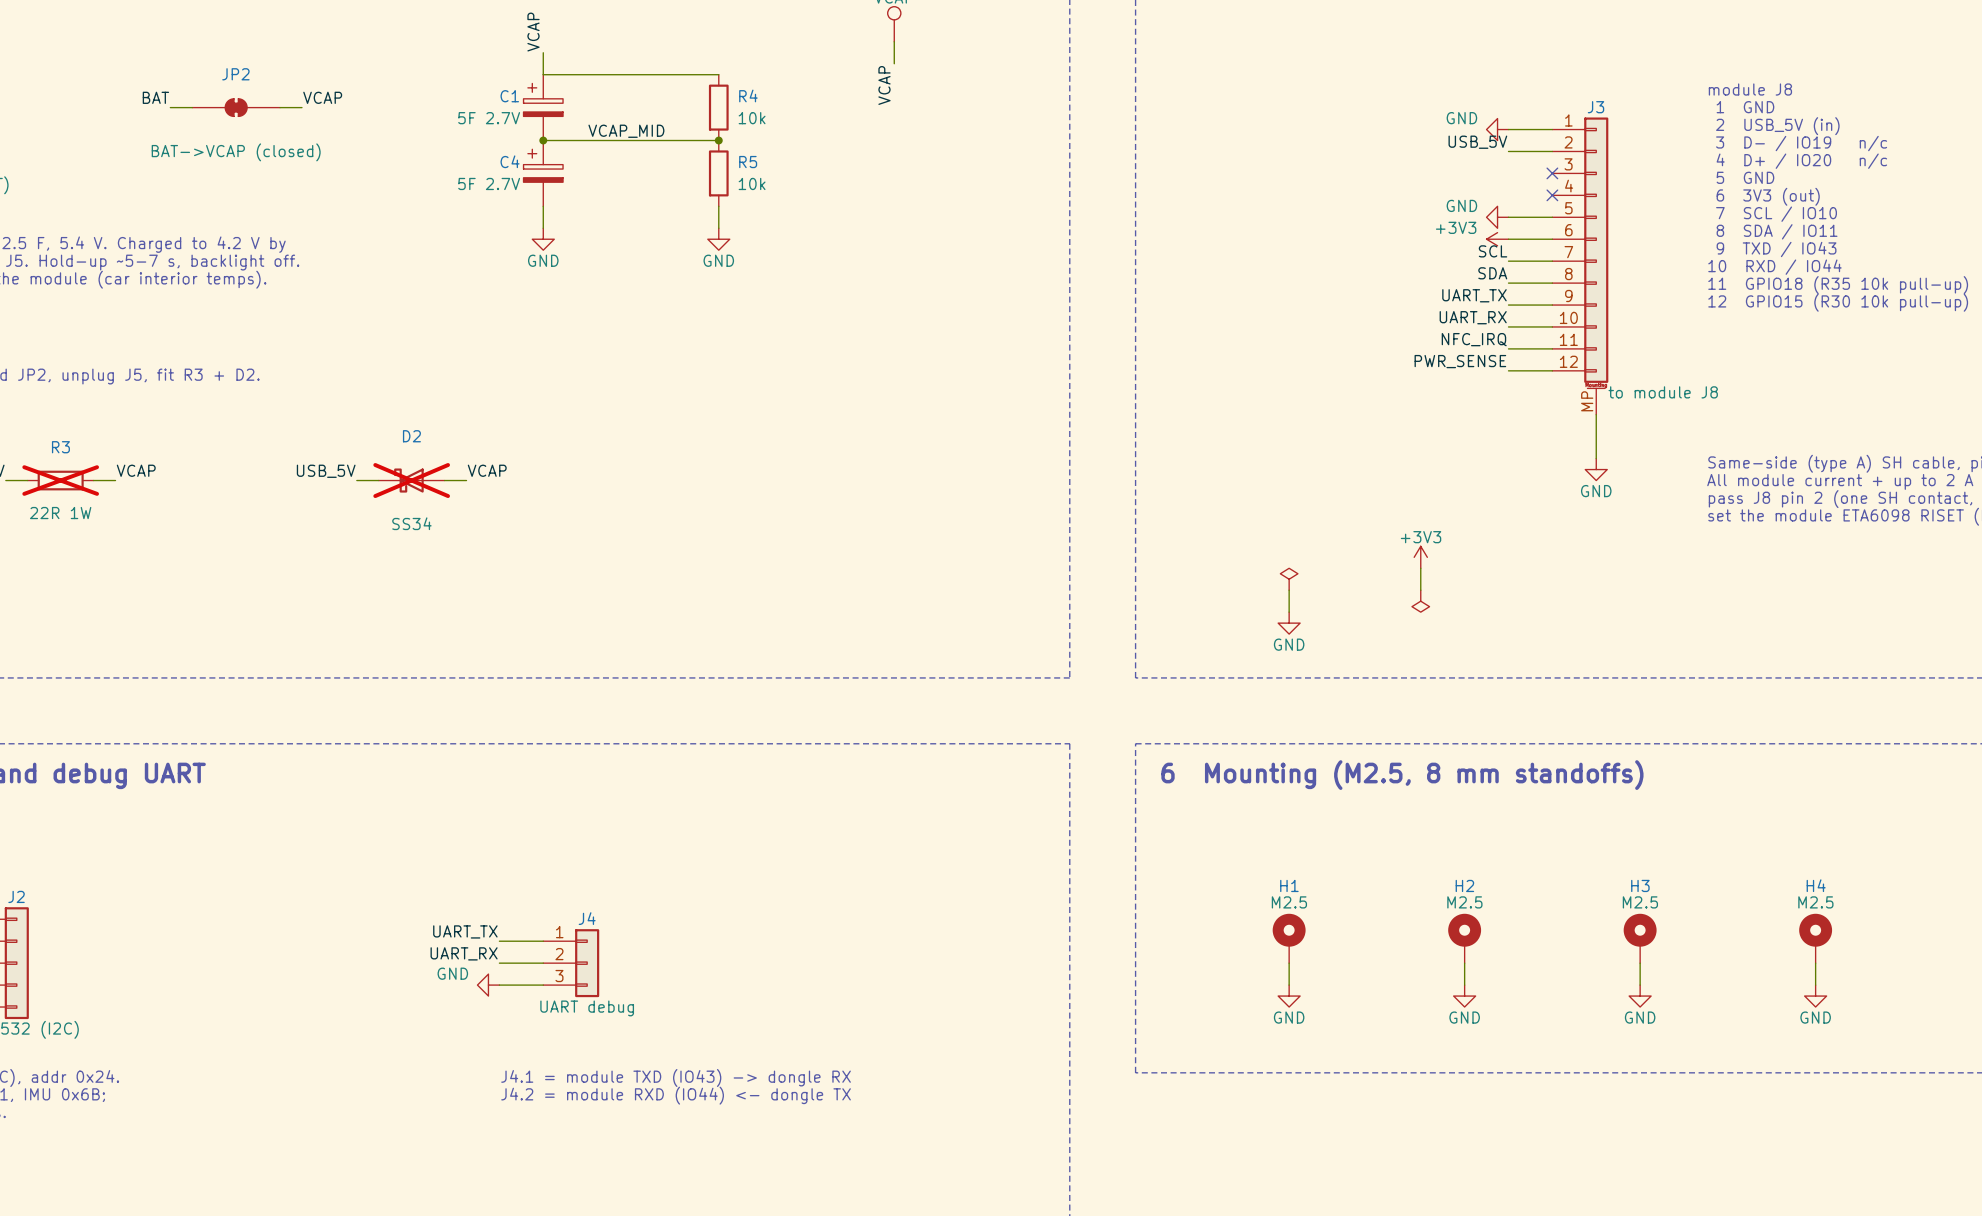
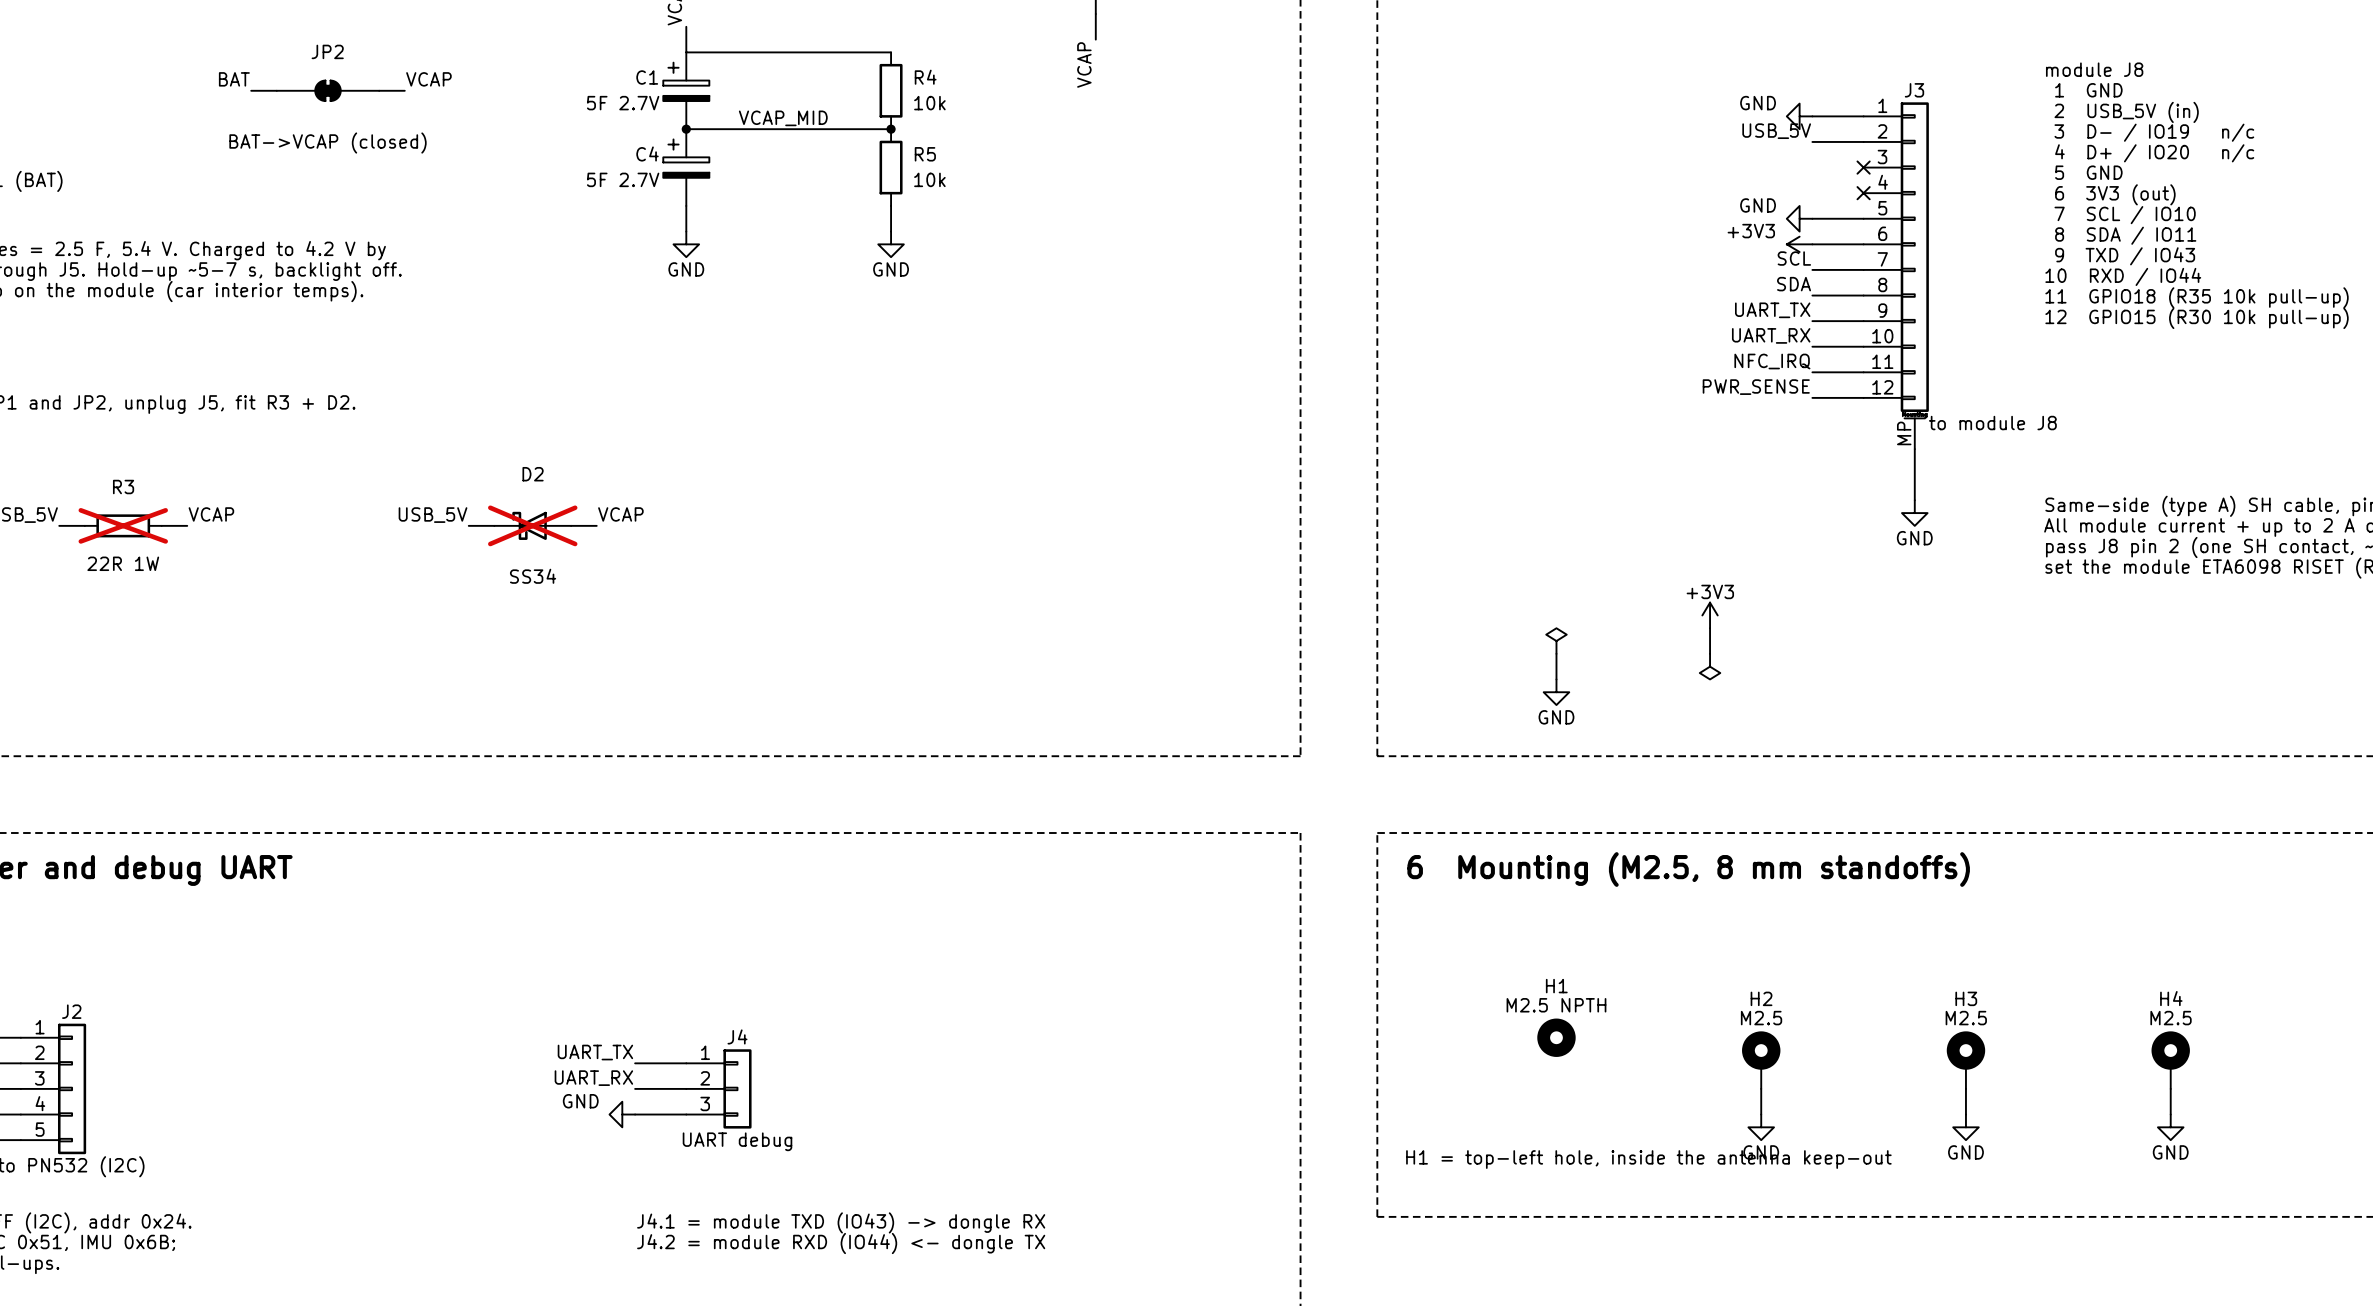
H1 value: M2.5 (1289, 902) -> M2.5 NPTH (1556, 1005)
H1 symbol: [1272, 913, 1306, 964] -> [1537, 1018, 1576, 1057]
wire: (1289, 963) (1289, 985) -> none
power symbol: GND (1289, 996) -> none
text: none -> H1 = top-left hole, inside the antenna keep-out (1648, 1159)

